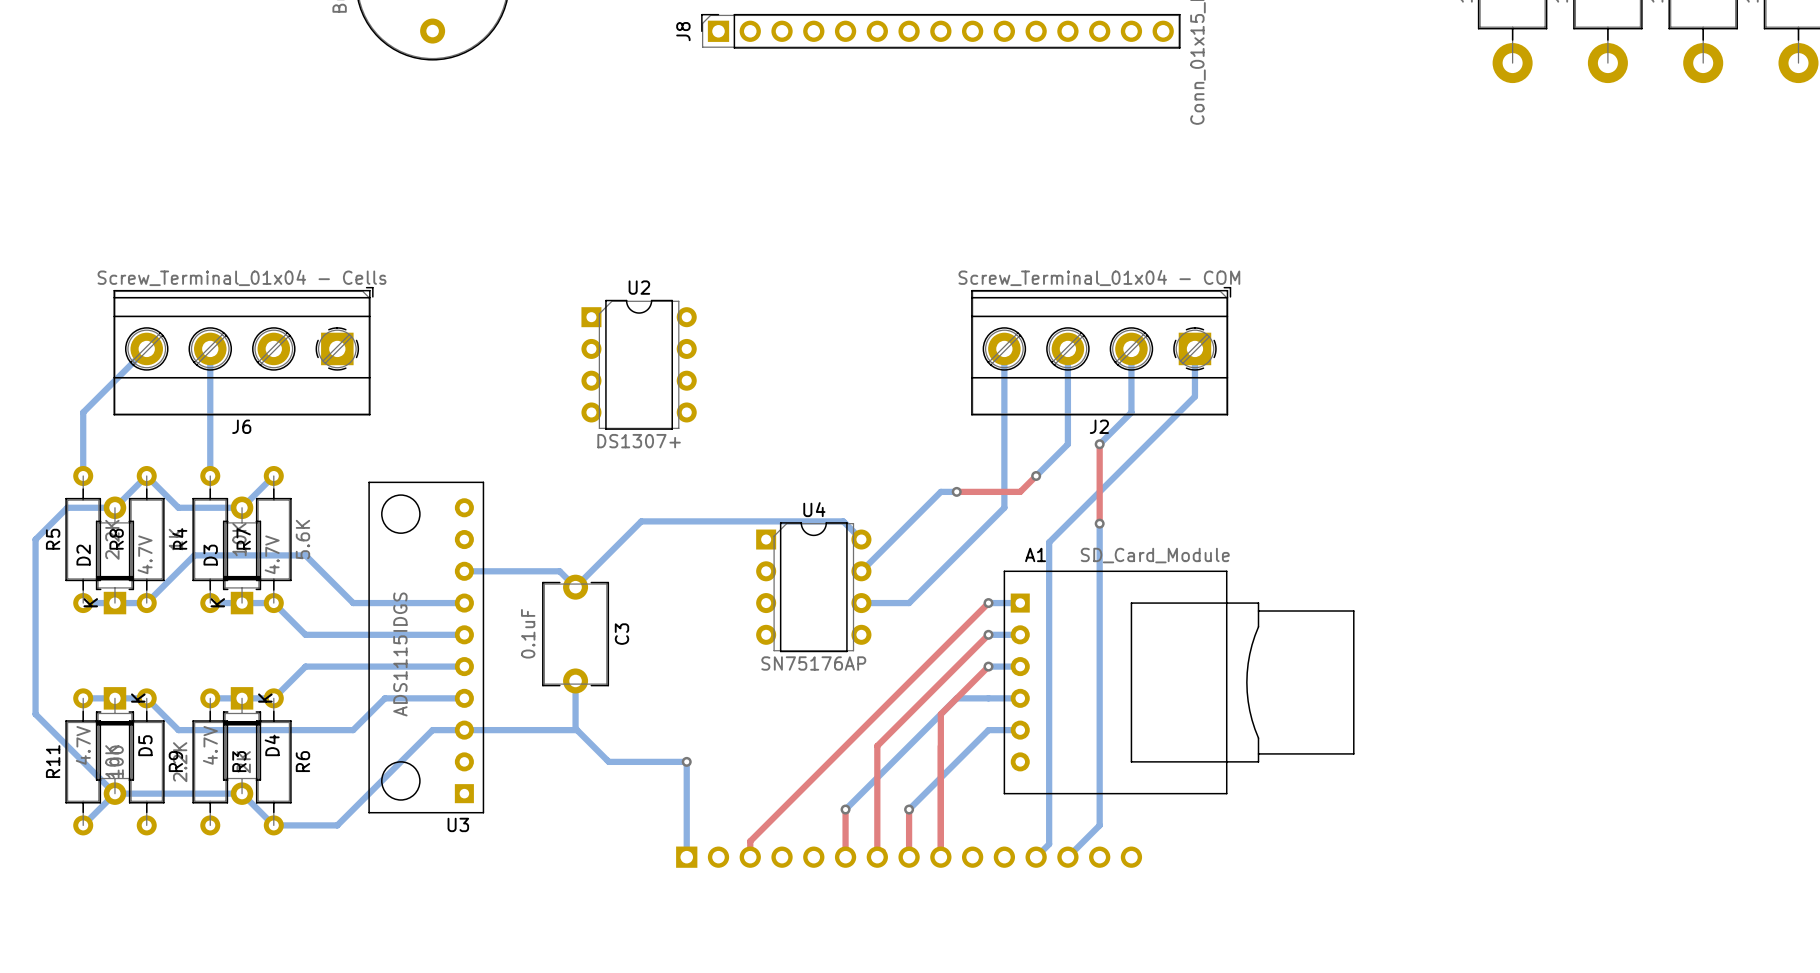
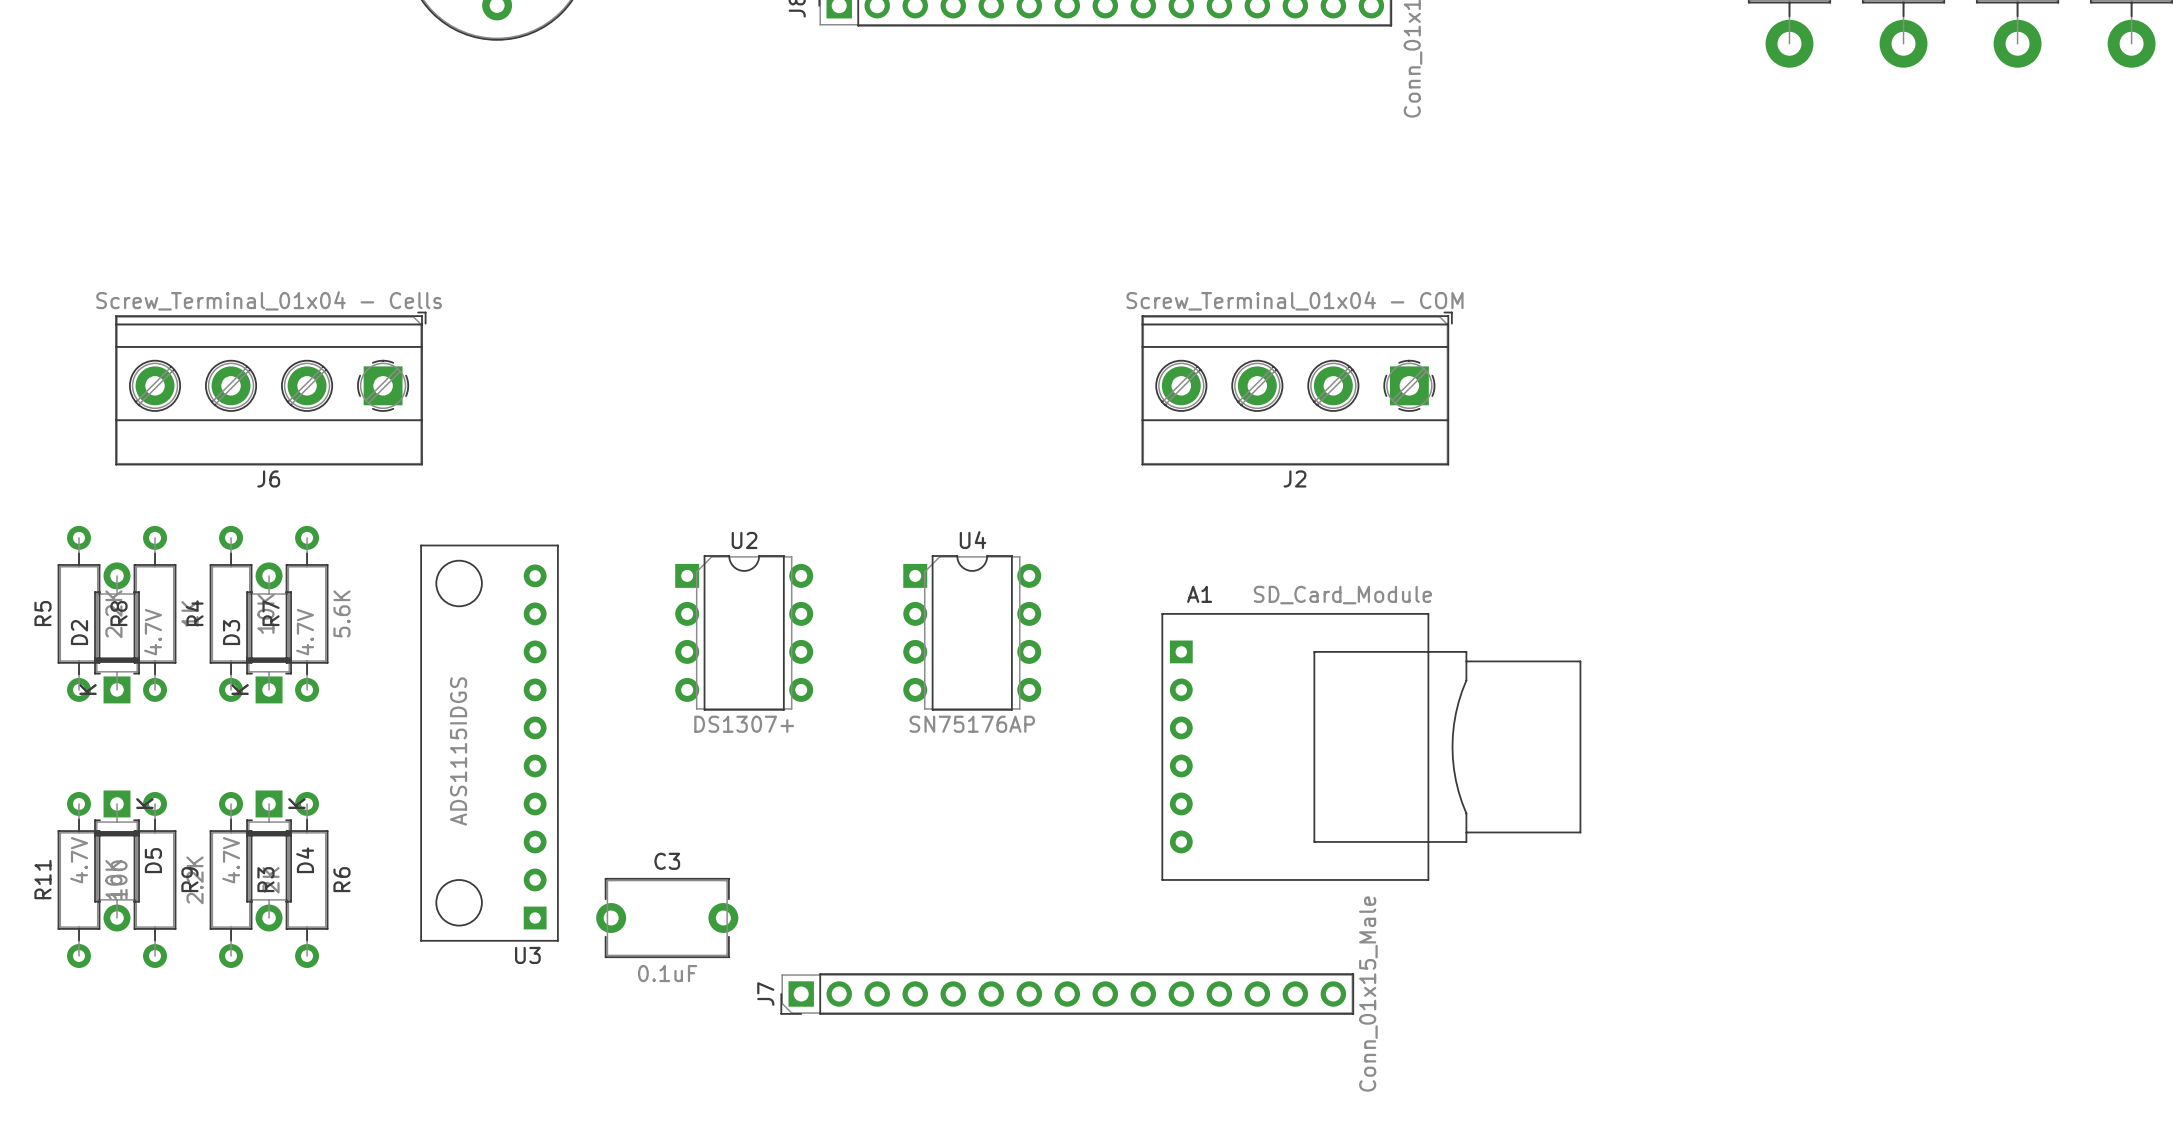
bottom track: (146, 348) (83, 412) (83, 476) -> none
bottom track: (210, 348) (210, 476) -> none
bottom track: (1004, 348) (1004, 507) (909, 603) (861, 603) -> none
bottom track: (1067, 348) (1067, 444) (1036, 476) -> none
bottom track: (1131, 348) (1131, 412) (1099, 444) -> none
bottom track: (1194, 348) (1194, 396) (1049, 542) (1049, 844) (1036, 857) -> none
U2 position: (639, 364) -> (744, 632)
top track: (1099, 444) (1099, 523) -> none
via: (1099, 444) -> none
bottom track: (273, 476) (242, 507) (178, 507) (146, 476) (114, 507) (67, 507) (35, 539) (35, 714) (114, 793) -> none
top track: (1036, 476) (1020, 491) (956, 491) -> none
via: (1036, 476) -> none
bottom track: (956, 491) (940, 491) (861, 571) -> none
via: (956, 491) -> none
bottom track: (1099, 523) (1099, 825) (1067, 857) -> none
via: (1099, 523) -> none
bottom track: (861, 539) (843, 521) (641, 521) (575, 587) (559, 571) (464, 571) -> none
U4 position: (813, 587) -> (972, 632)
bottom track: (83, 603) (146, 603) (194, 555) (305, 555) (353, 603) (464, 603) -> none
bottom track: (210, 603) (273, 603) (305, 634) (464, 634) -> none
bottom track: (988, 603) (1020, 603) -> none
top track: (988, 603) (750, 841) (750, 857) -> none
via: (988, 603) -> none
C3 value position: 0.1uF (528, 633) -> 0.1uF (667, 973)
C3 rotation: 0° (575, 634) -> 90° clockwise (667, 917)
C3 position: (575, 634) -> (667, 917)
C3 name position: C3 (621, 634) -> C3 (667, 861)
bottom track: (988, 634) (1020, 634) (1020, 640) -> none
top track: (988, 634) (877, 746) (877, 857) (882, 851) -> none
via: (988, 634) -> none
bottom track: (464, 666) (305, 666) (273, 698) (210, 698) -> none
bottom track: (988, 666) (1020, 666) -> none
top track: (988, 666) (940, 714) (940, 857) -> none
via: (988, 666) -> none
bottom track: (575, 680) (575, 728) (608, 761) (686, 761) (686, 857) -> none
A1 position: (1179, 682) -> (1371, 746)
bottom track: (83, 698) (146, 698) (178, 730) (353, 730) (384, 698) (464, 698) -> none
bottom track: (1020, 698) (956, 698) (845, 809) -> none
bottom track: (577, 730) (432, 730) (337, 825) (273, 825) (242, 793) (114, 793) -> none
bottom track: (1020, 730) (988, 730) (909, 809) -> none
via: (686, 761) -> none
bottom track: (114, 793) (83, 825) -> none
top track: (845, 809) (845, 857) -> none
via: (845, 809) -> none
top track: (909, 809) (909, 857) -> none
via: (909, 809) -> none
J7 side: bottom (909, 857) -> top (1067, 994)

